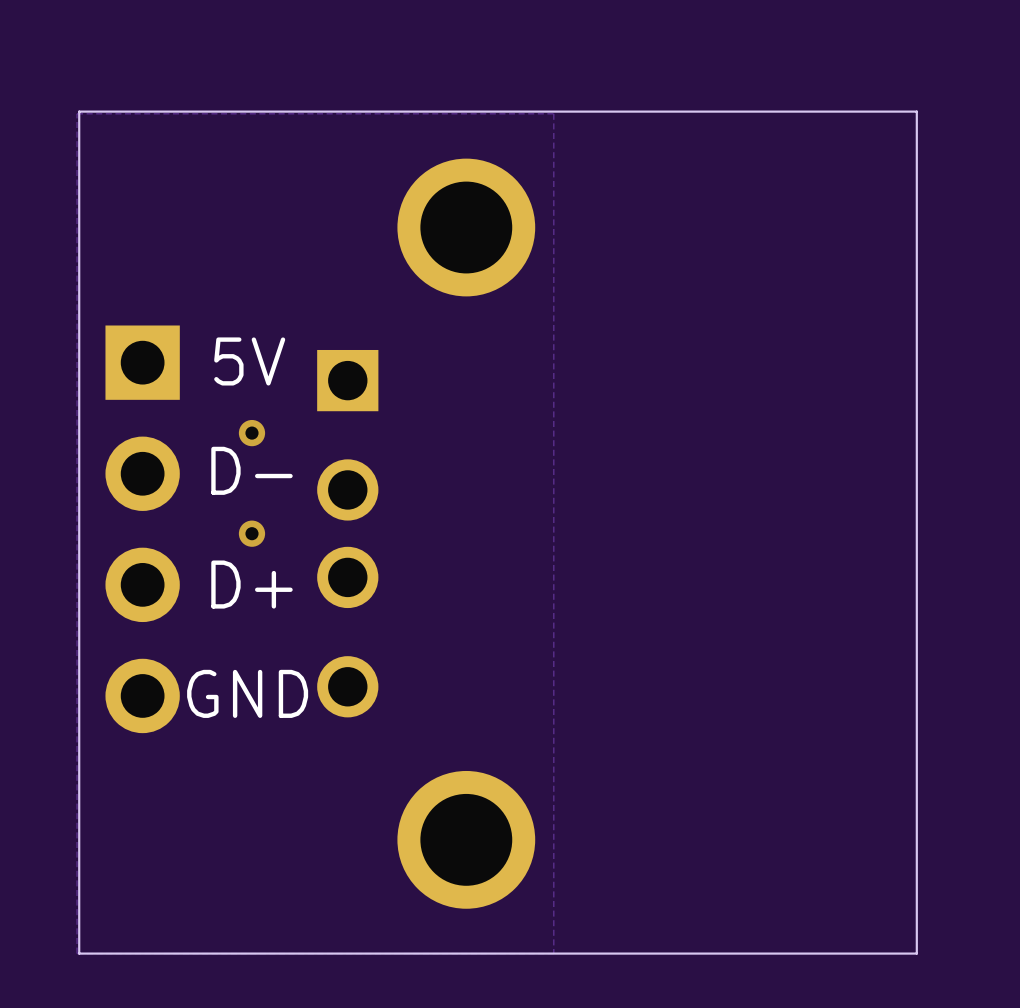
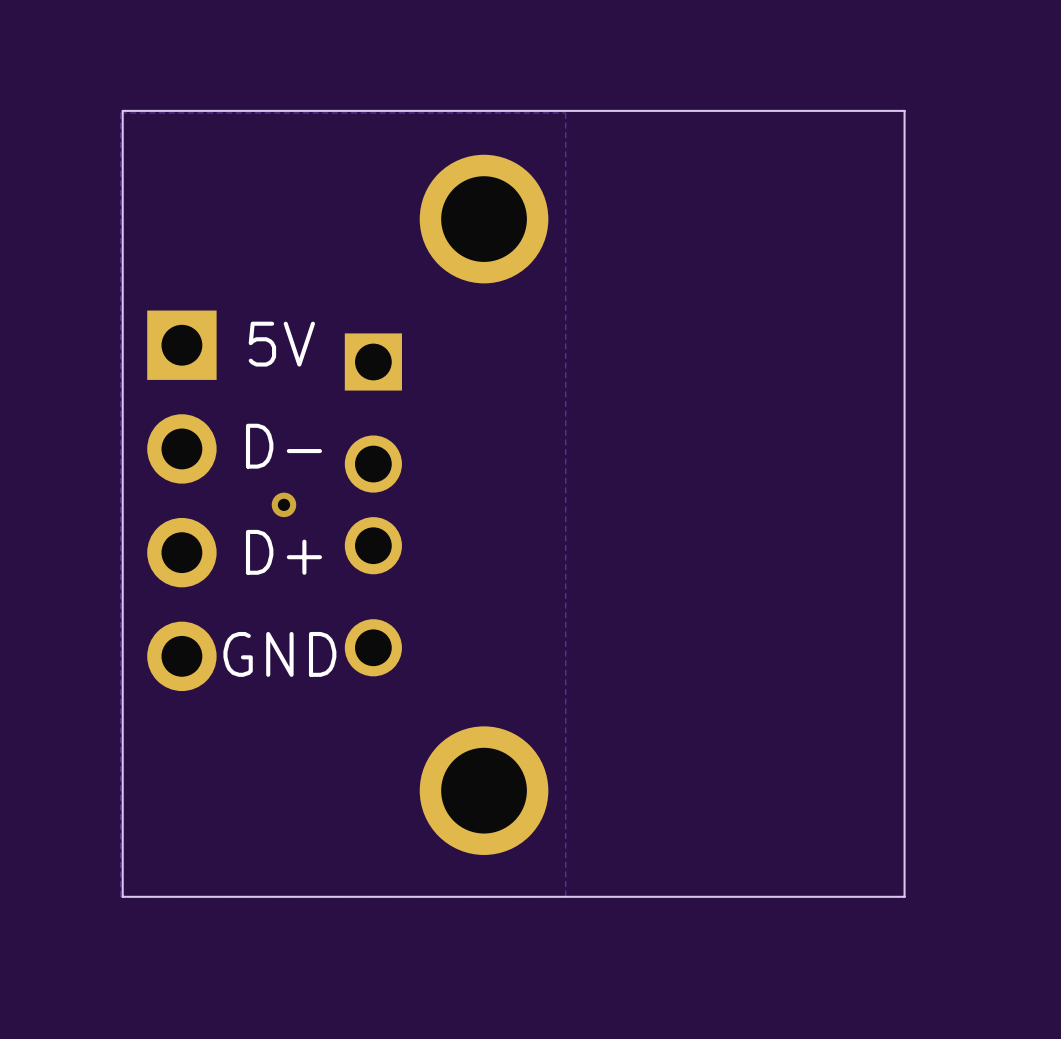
via: (251, 433) -> none

